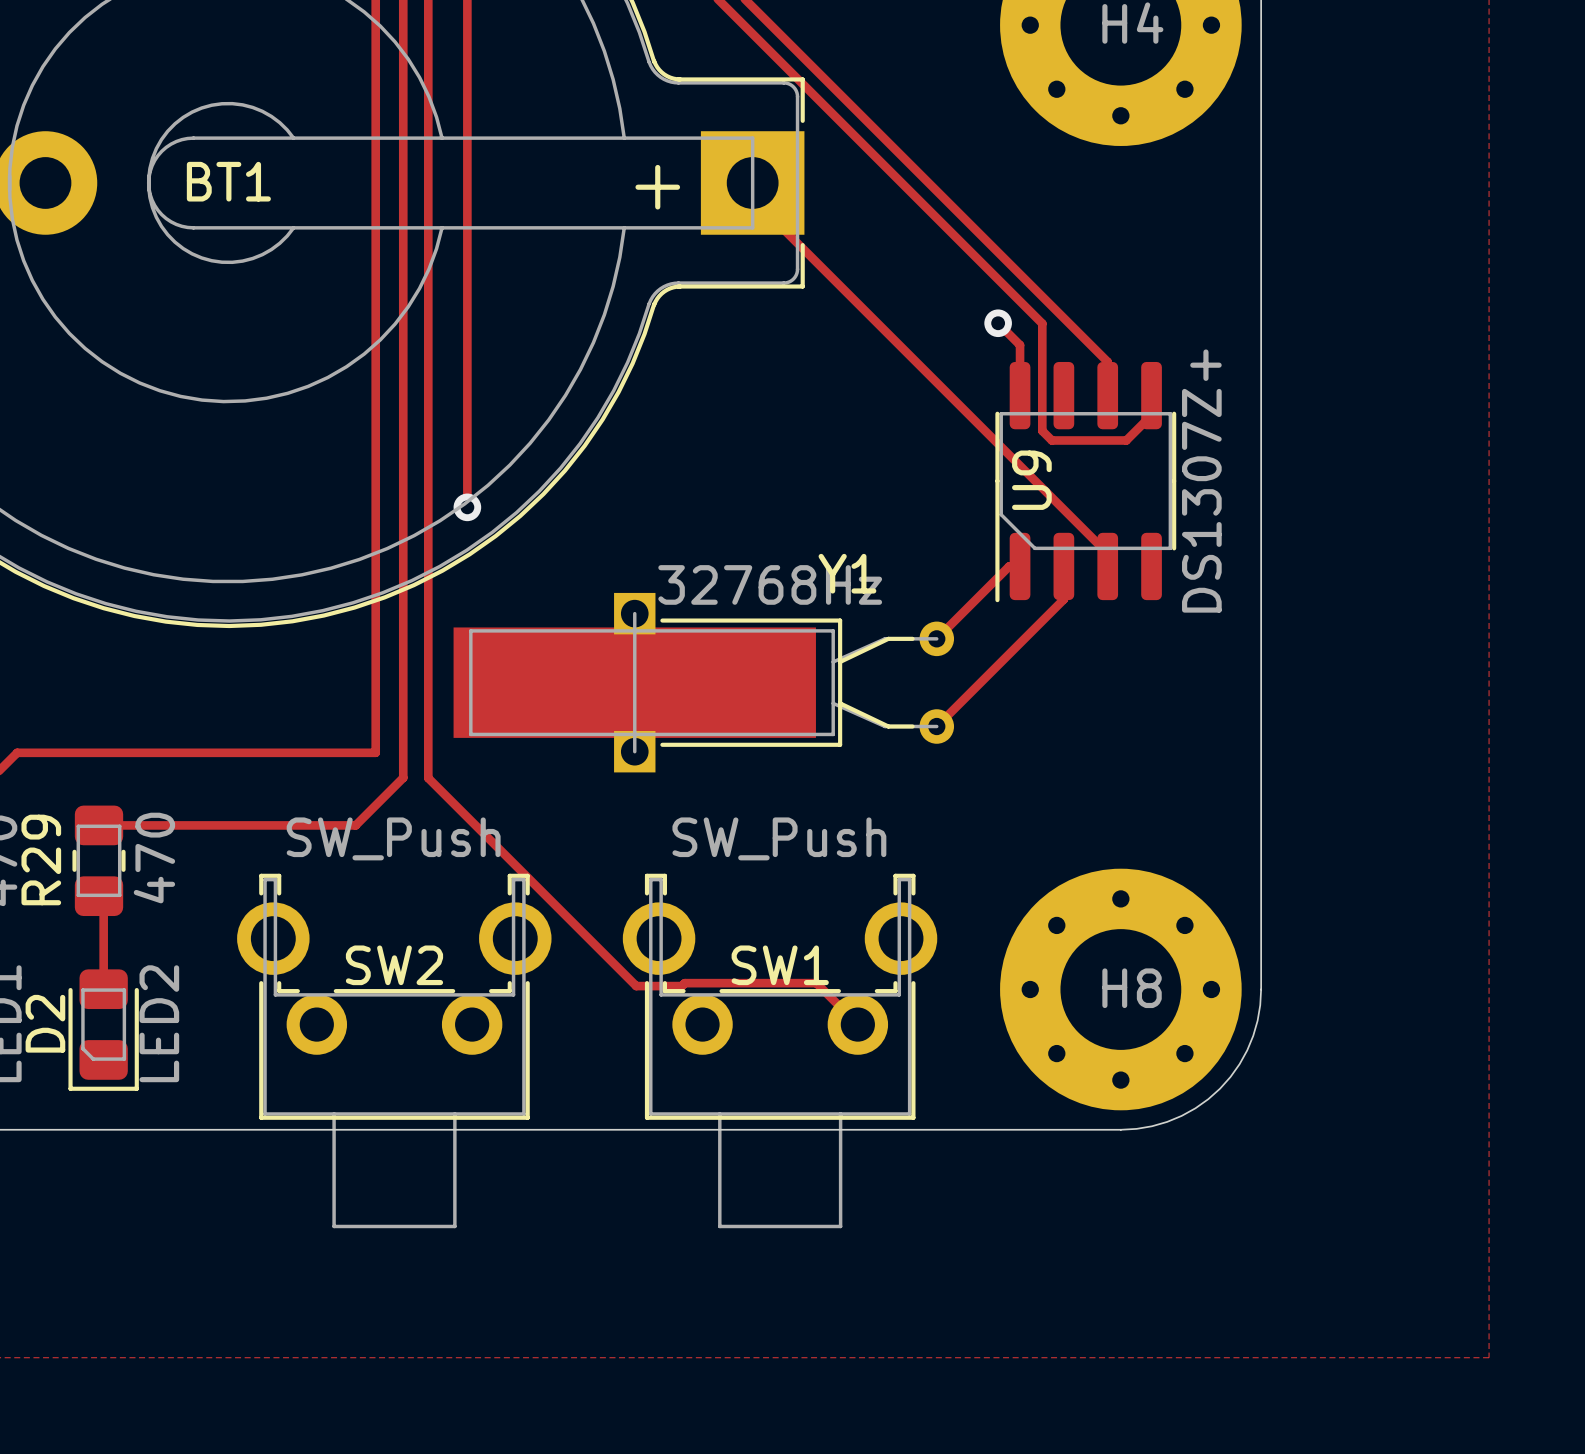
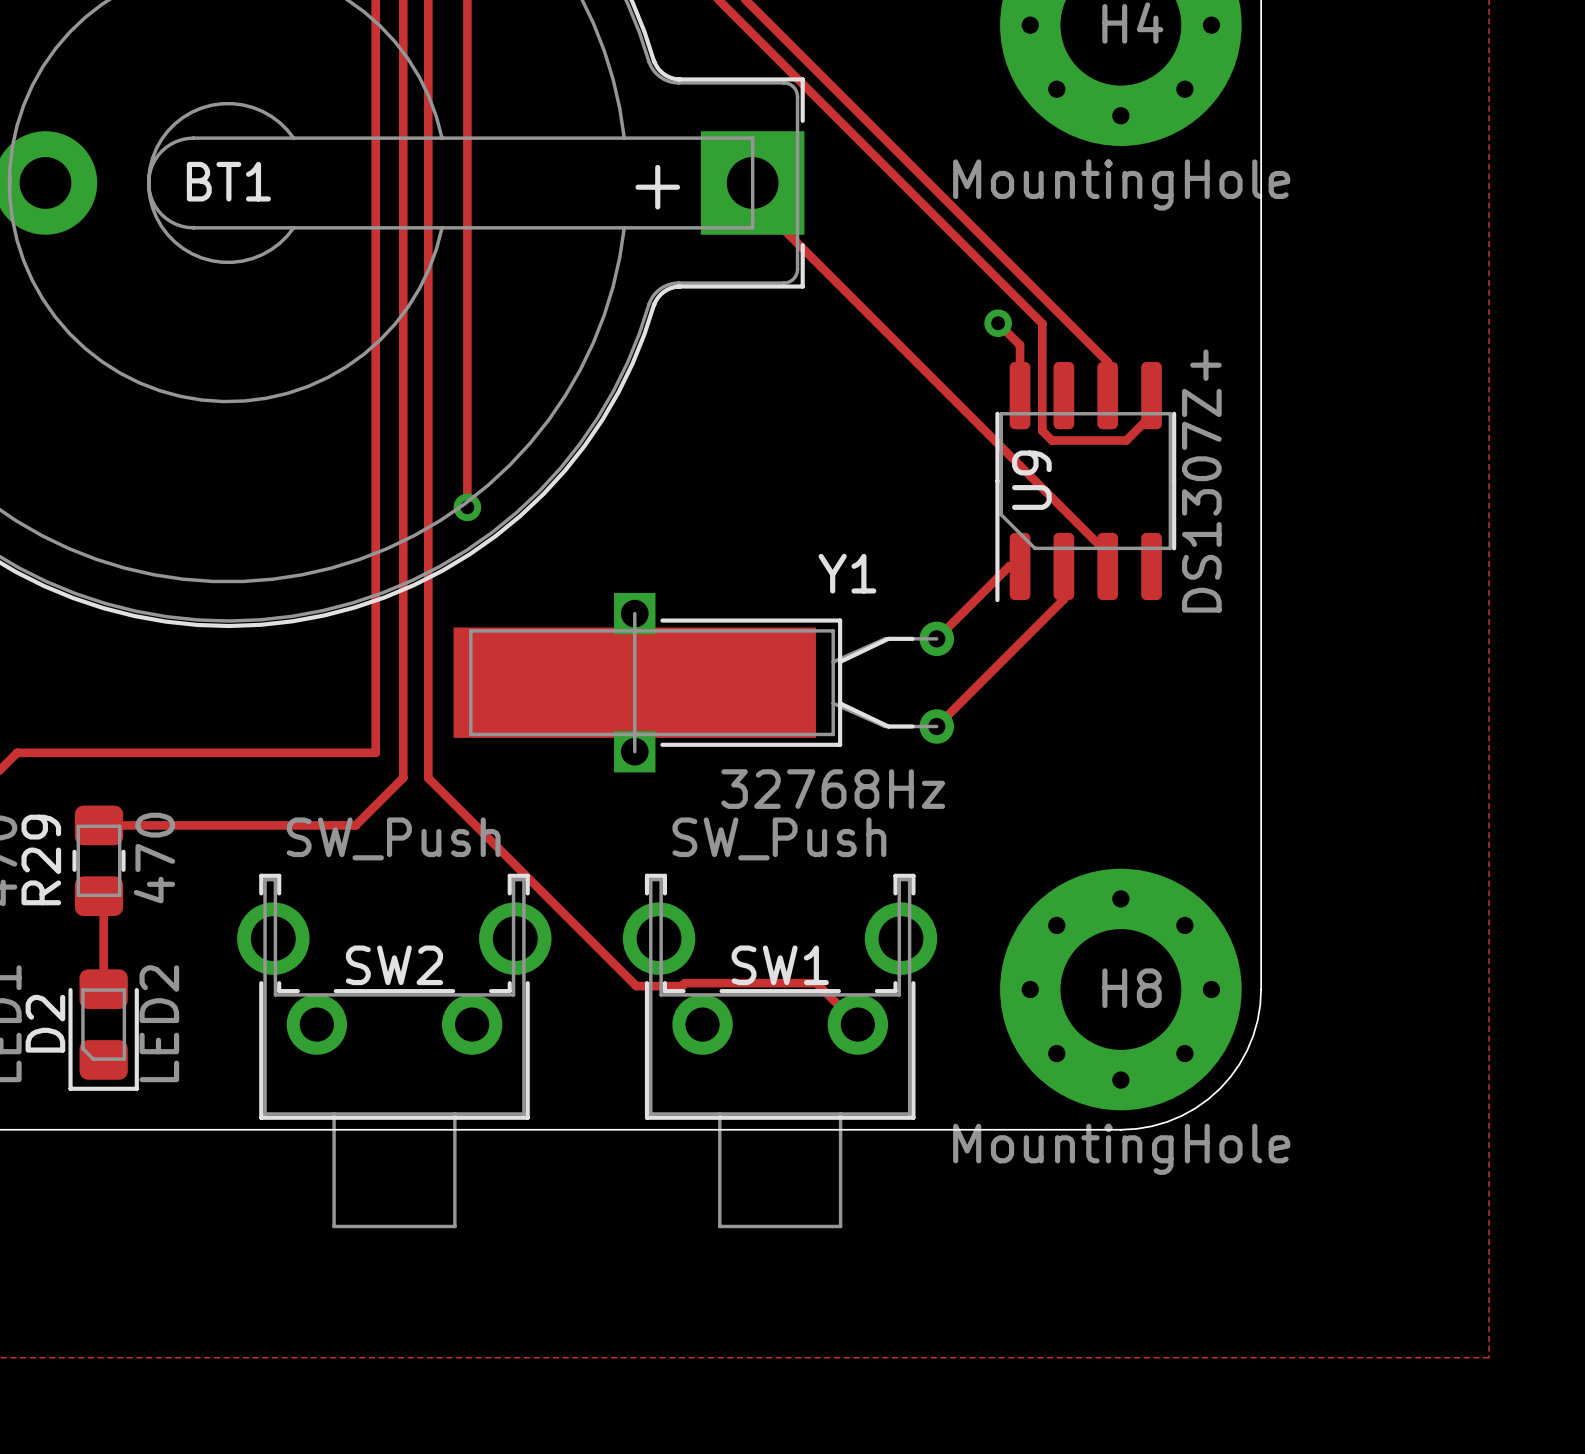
H4 value: none -> MountingHole (1121, 184)
Y1 value position: 32768Hz (770, 584) -> 32768Hz (833, 789)
H8 value: none -> MountingHole (1121, 1149)

